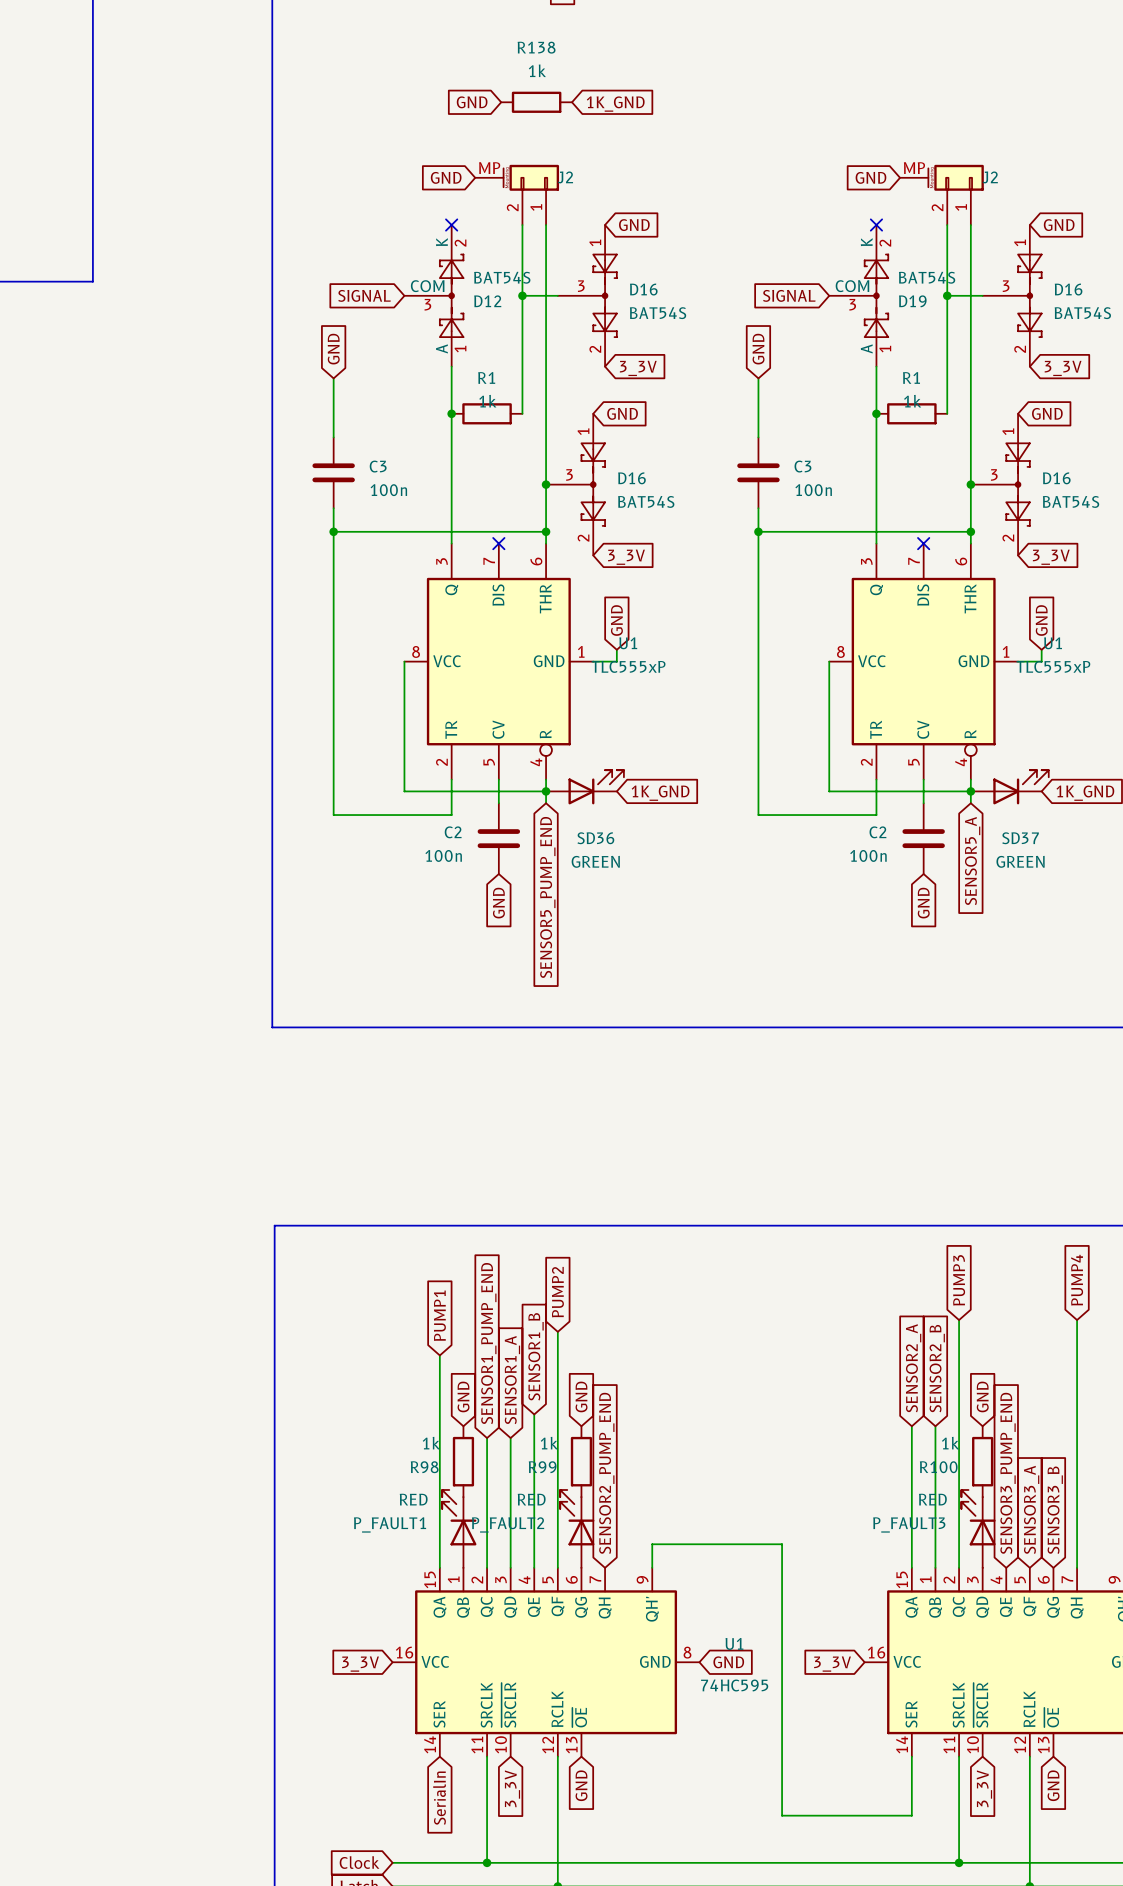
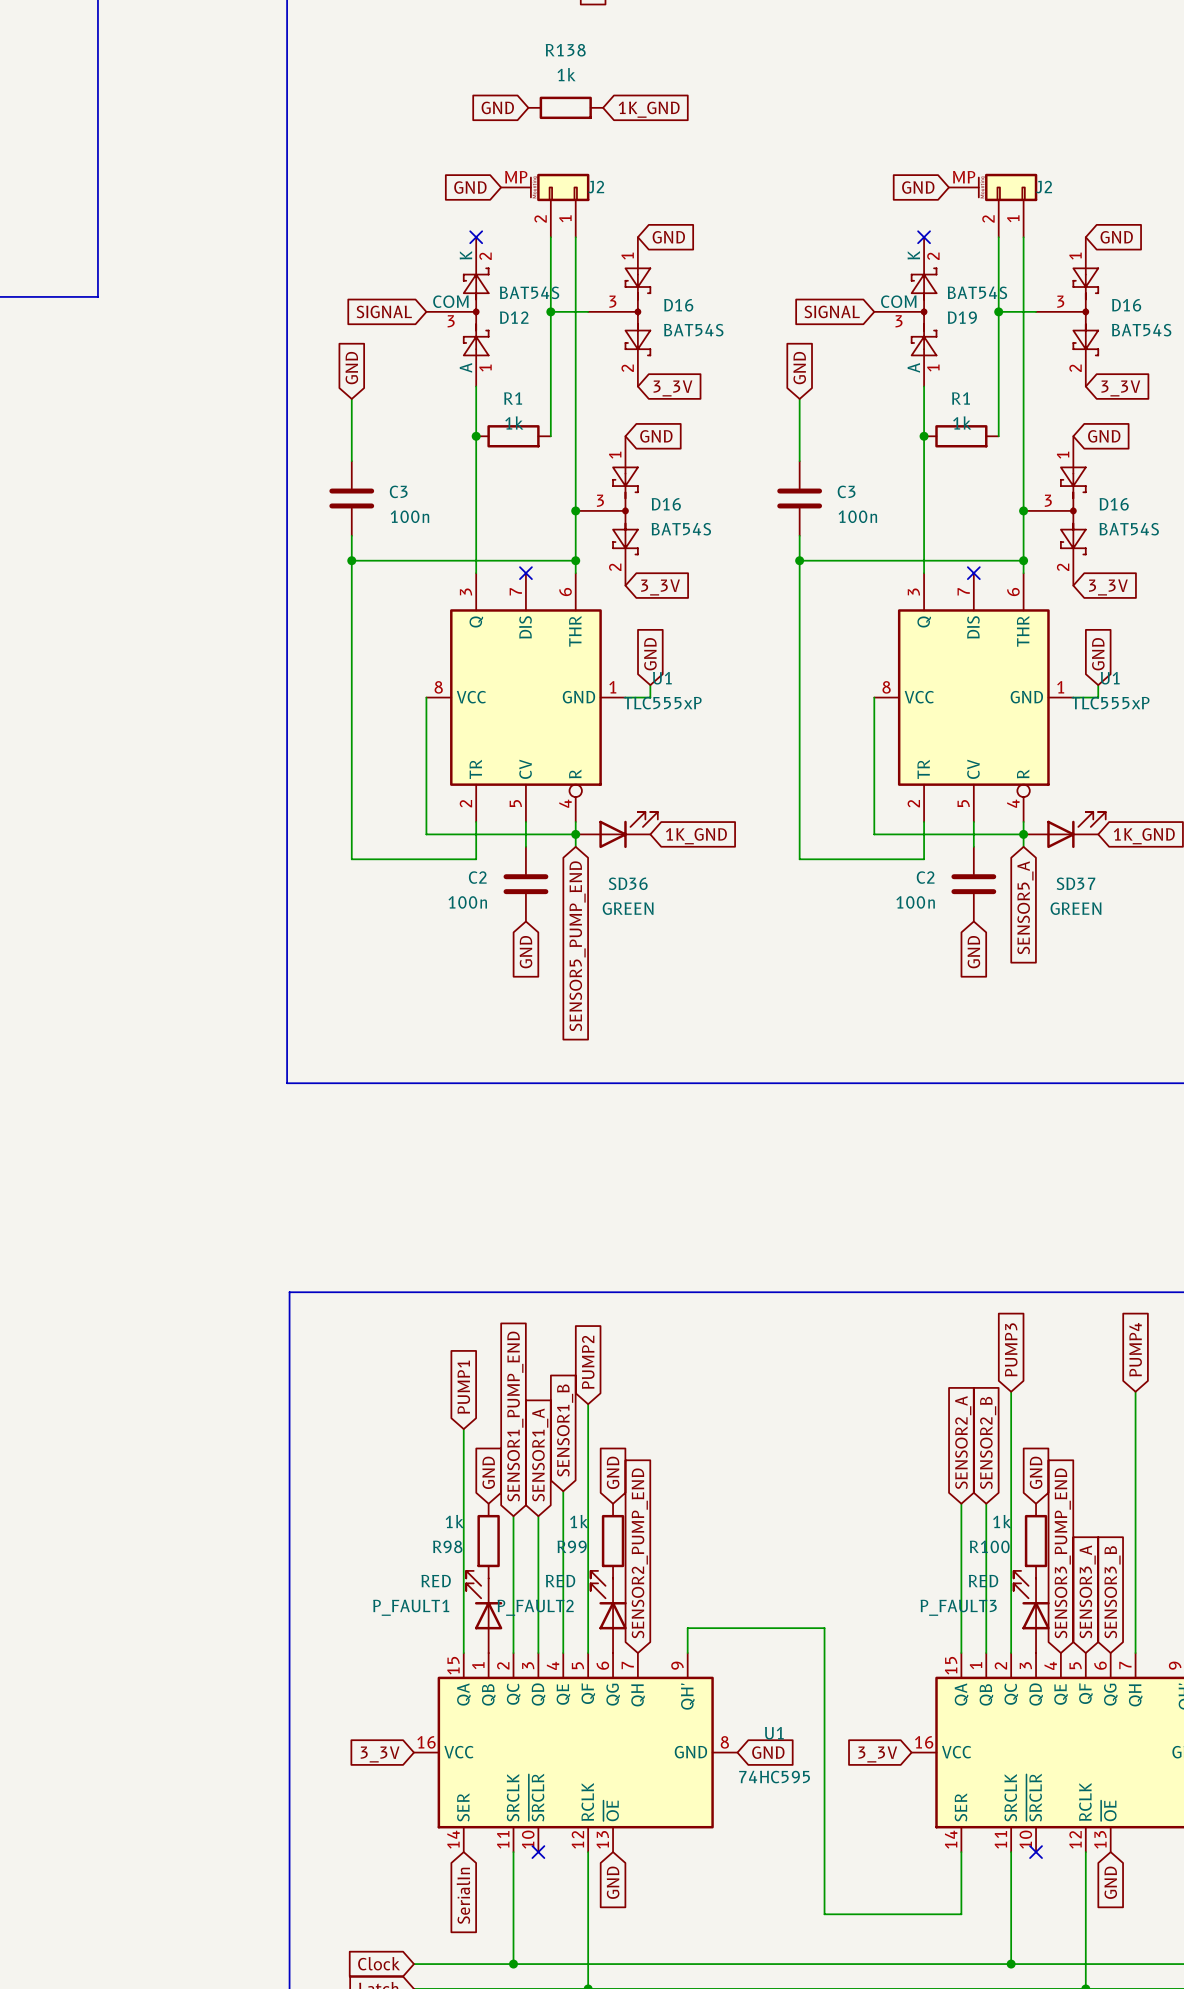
no-connect mark: none -> (538, 1852)
no-connect mark: none -> (1036, 1852)
global label: 3_3V (512, 1788) -> none
global label: 3_3V (984, 1788) -> none

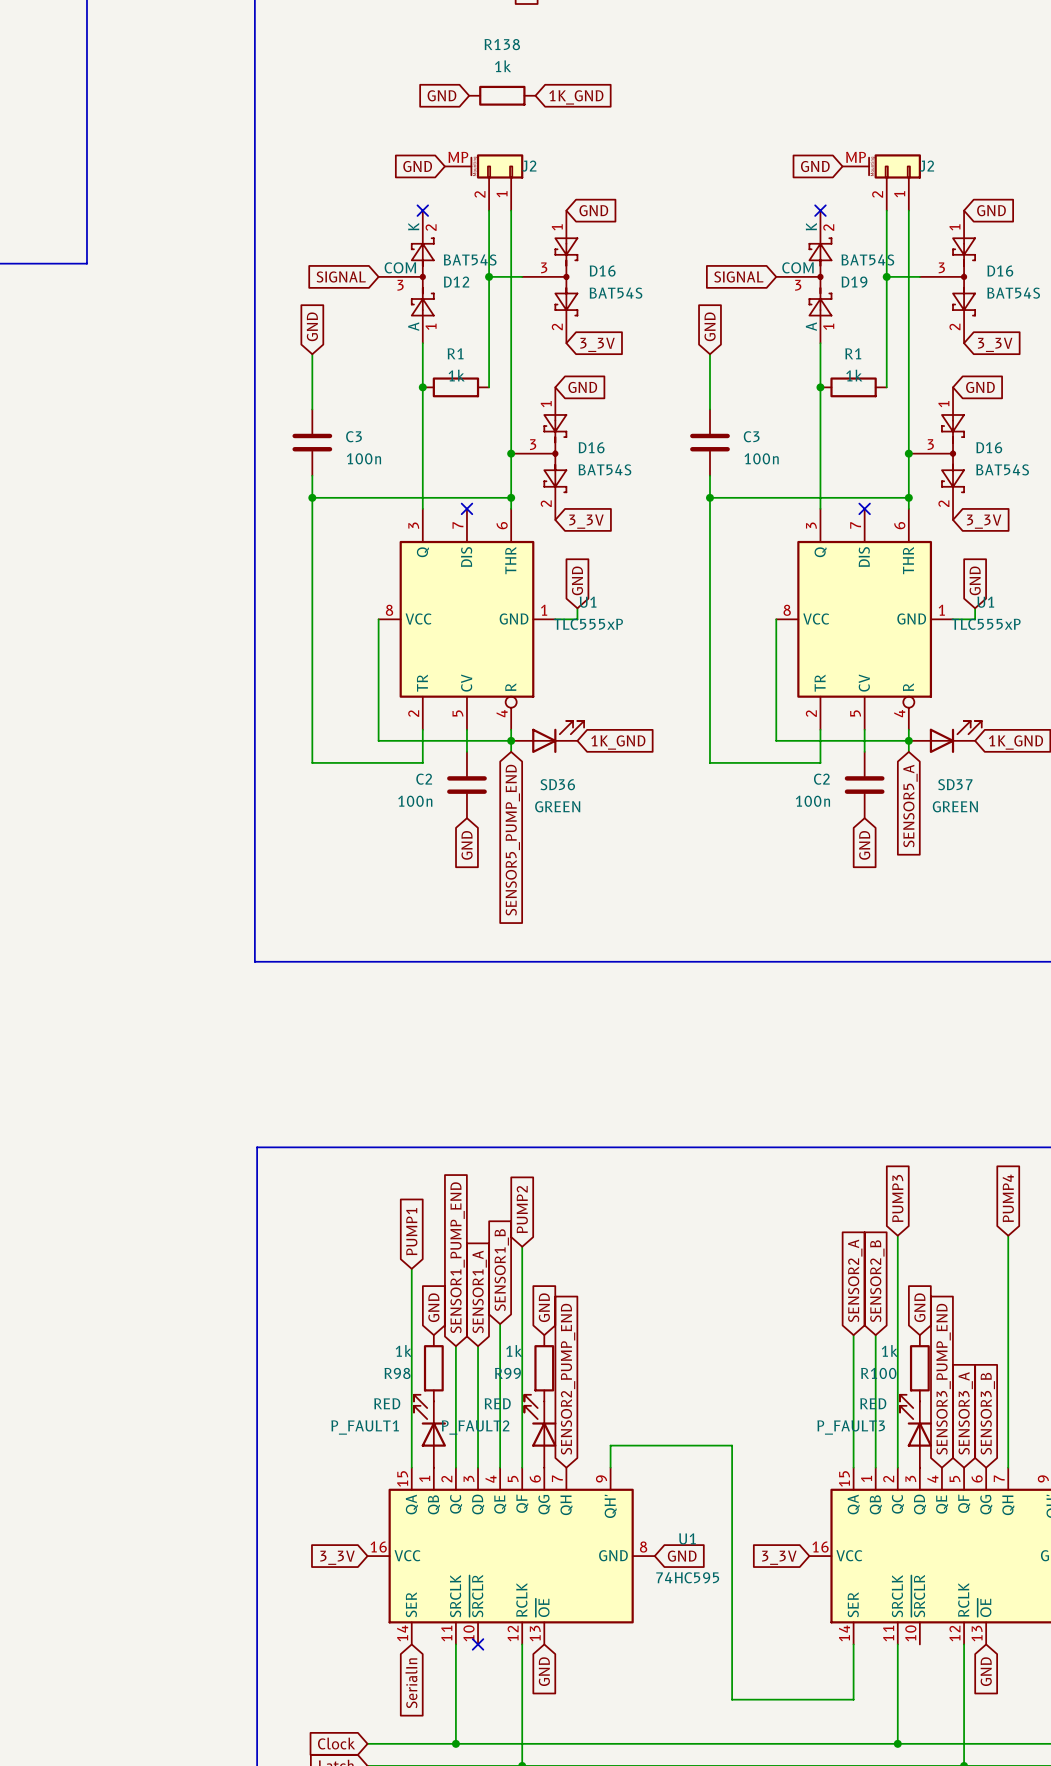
no-connect mark: (1036, 1852) -> none

